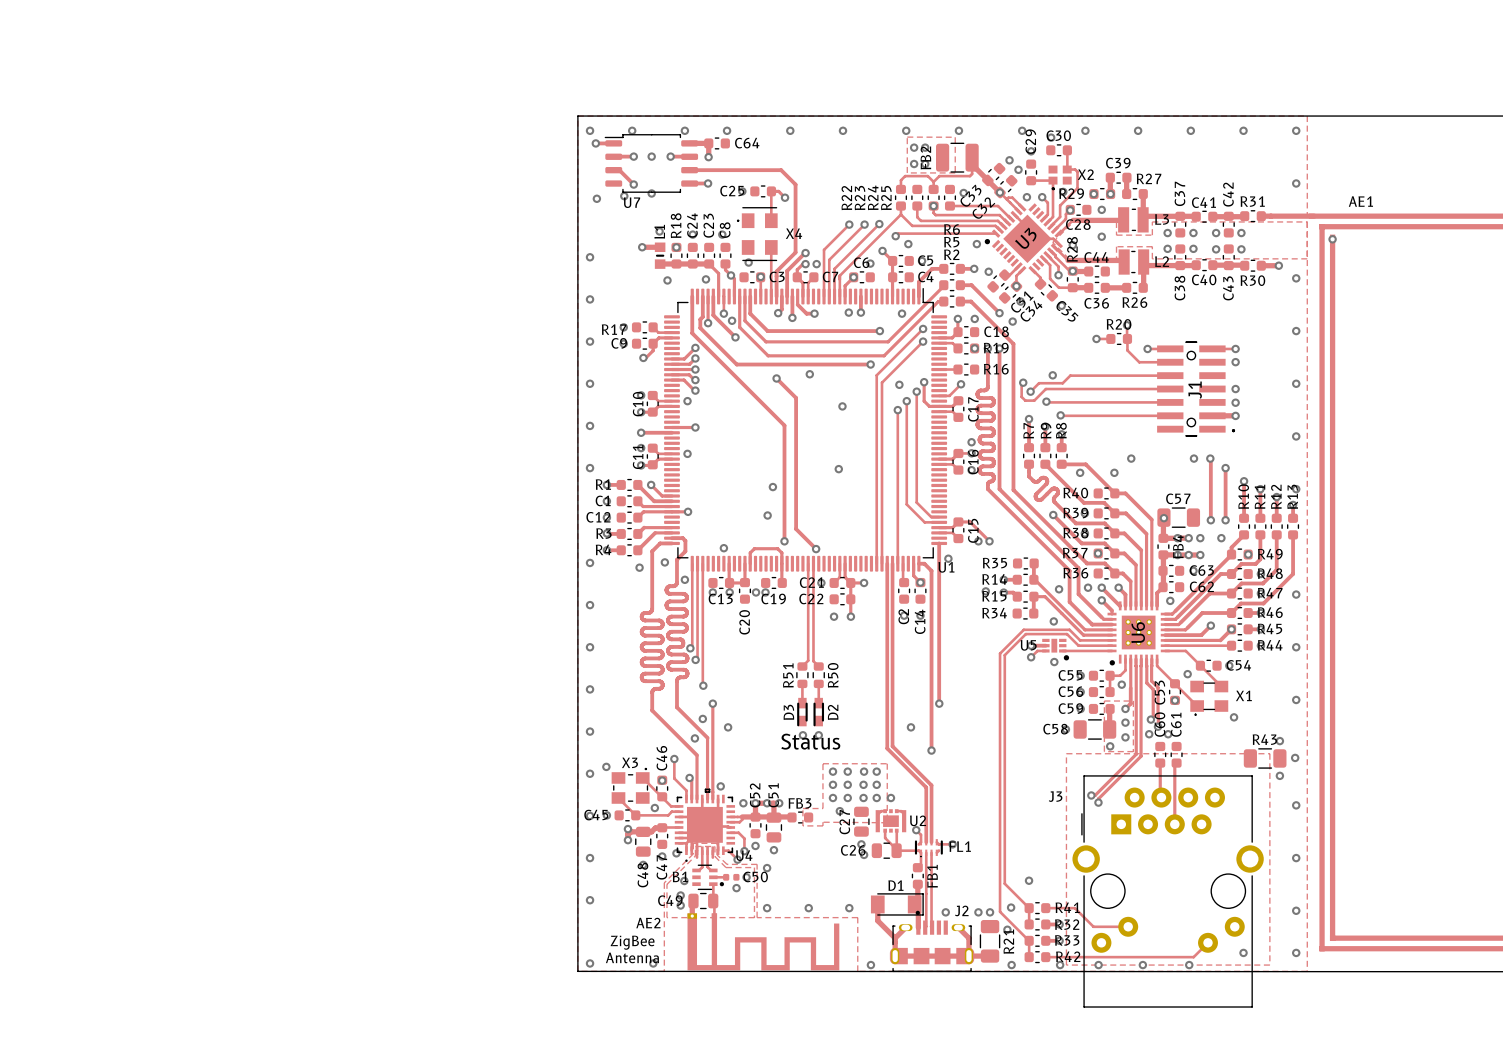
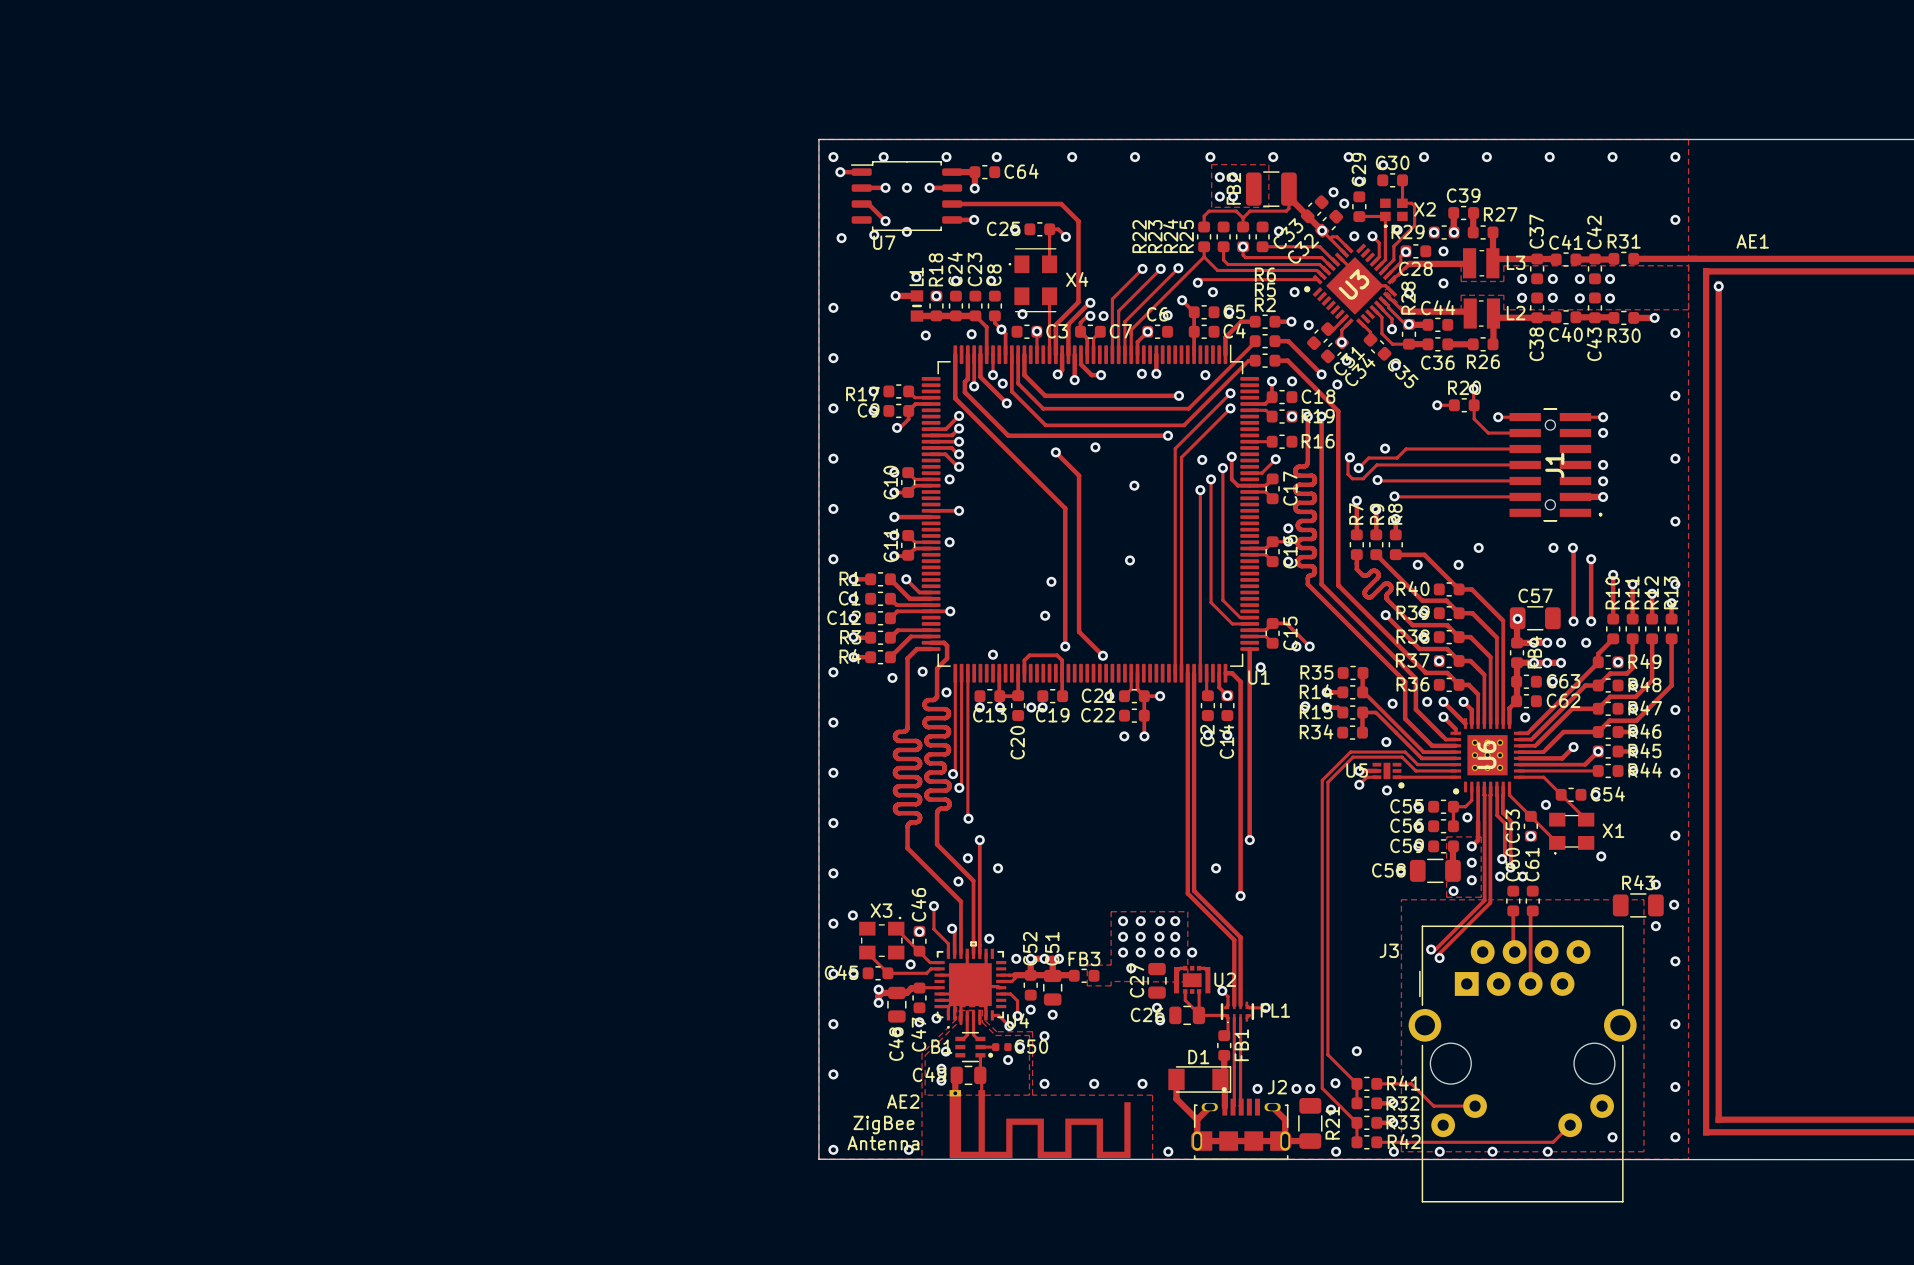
track: (808, 563) (808, 660) (802, 666) -> none
track: (813, 563) (813, 661) (818, 666) -> none
R51: (802, 675) -> none
R50: (818, 675) -> none
track: (802, 683) (802, 703) -> none
track: (818, 683) (818, 703) -> none
D3: (802, 712) -> none
D2: (818, 712) -> none
via: (802, 735) -> none
via: (818, 735) -> none
text: Status (810, 741) -> none

